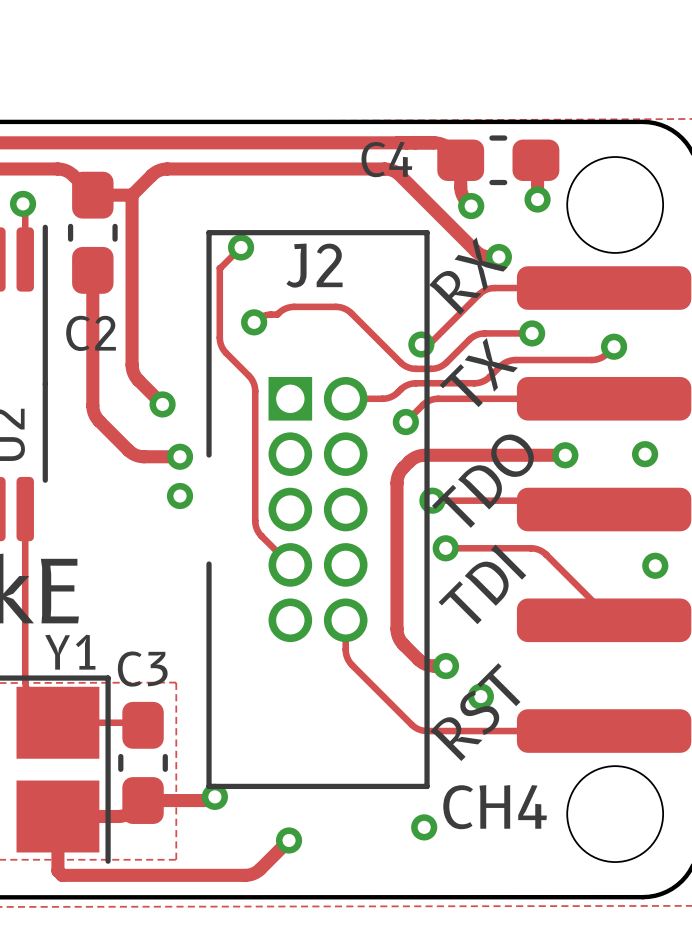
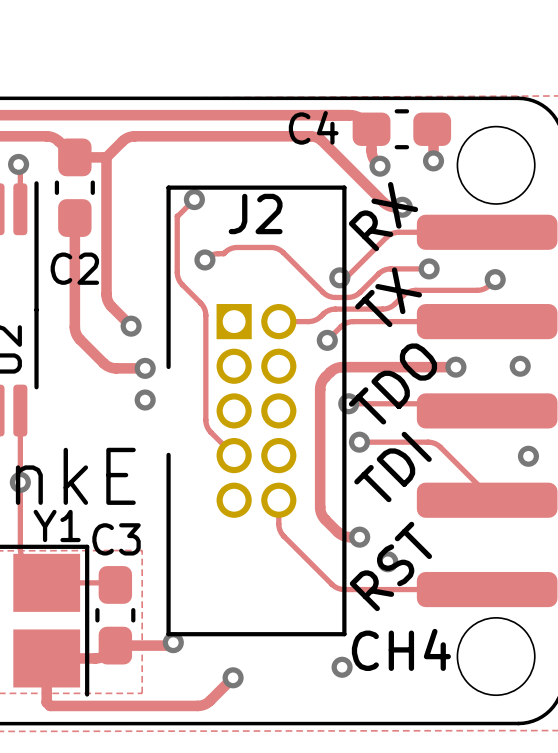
via: none -> (20, 482)

